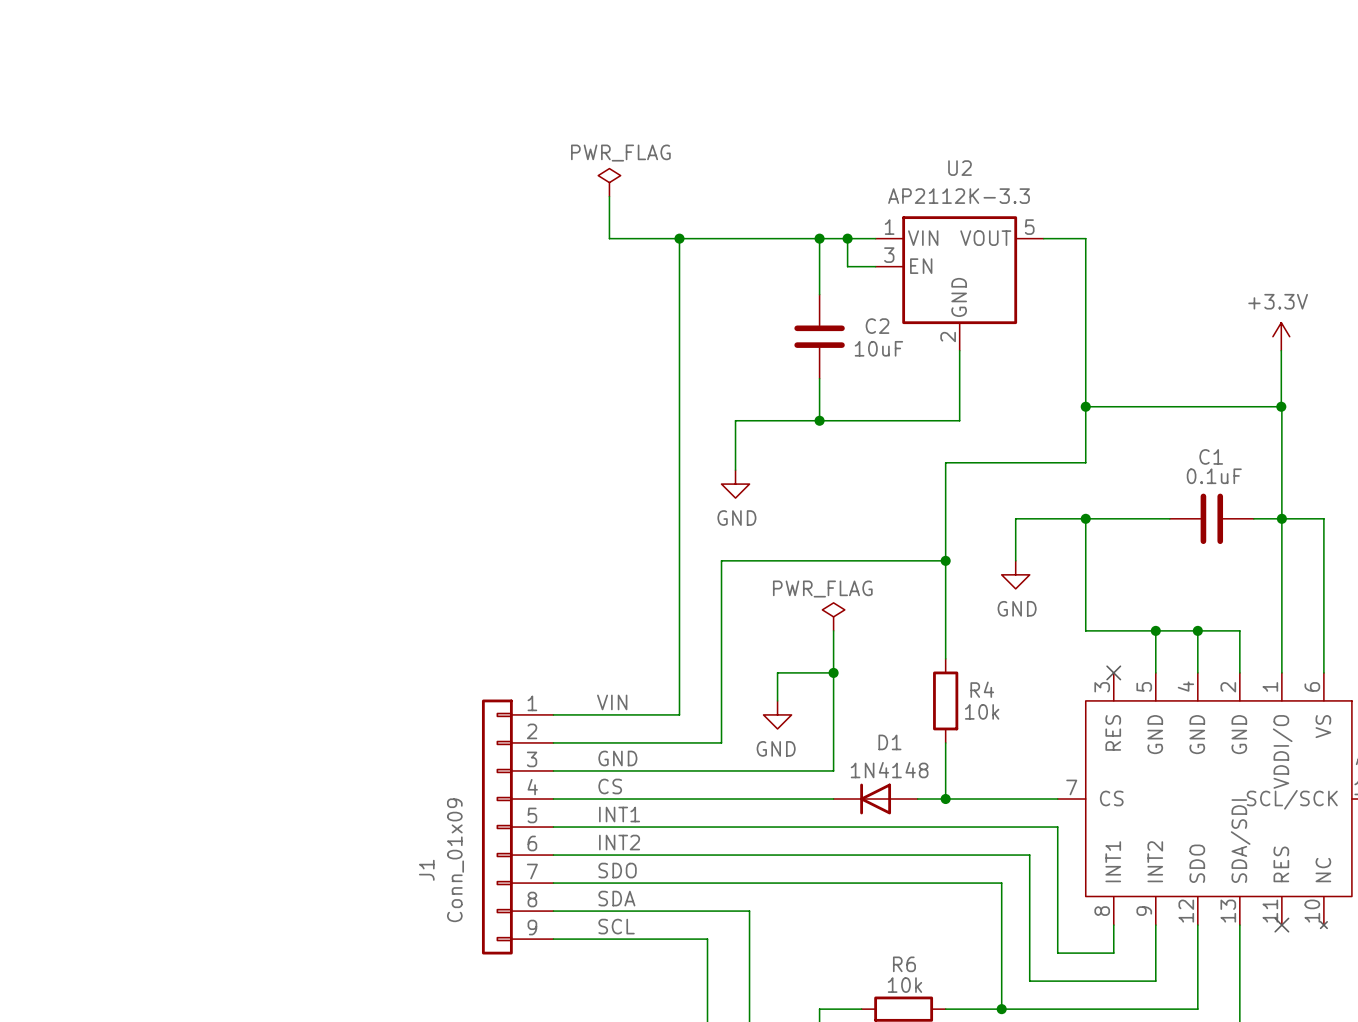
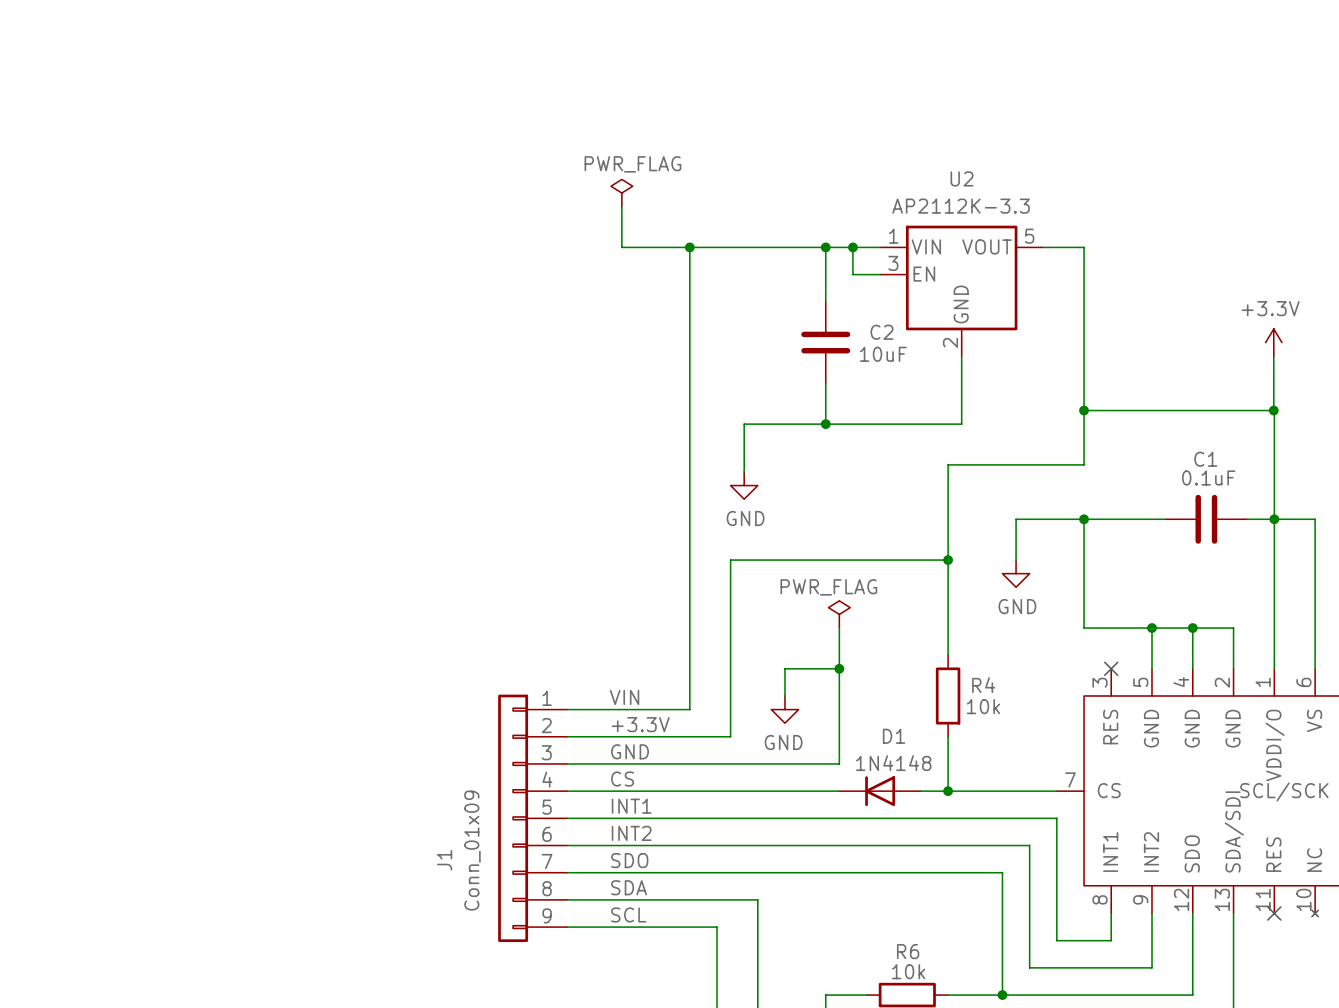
label: none -> +3.3V (640, 724)

